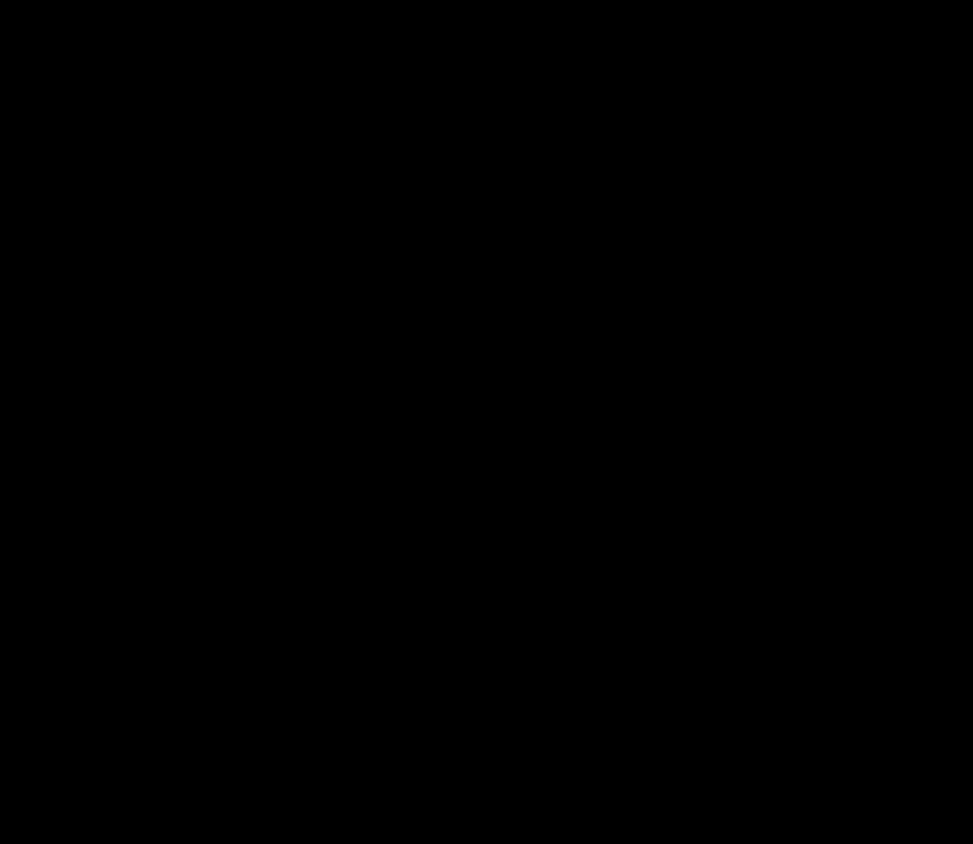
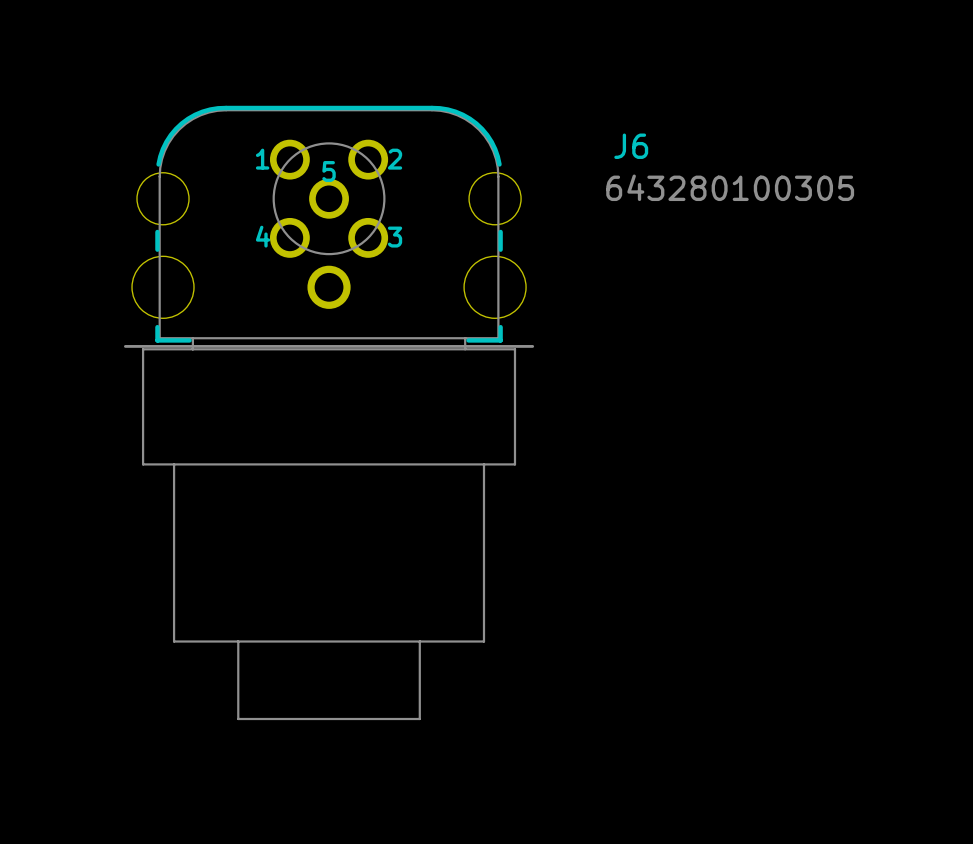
J6: none -> 643280100305 (329, 412)

